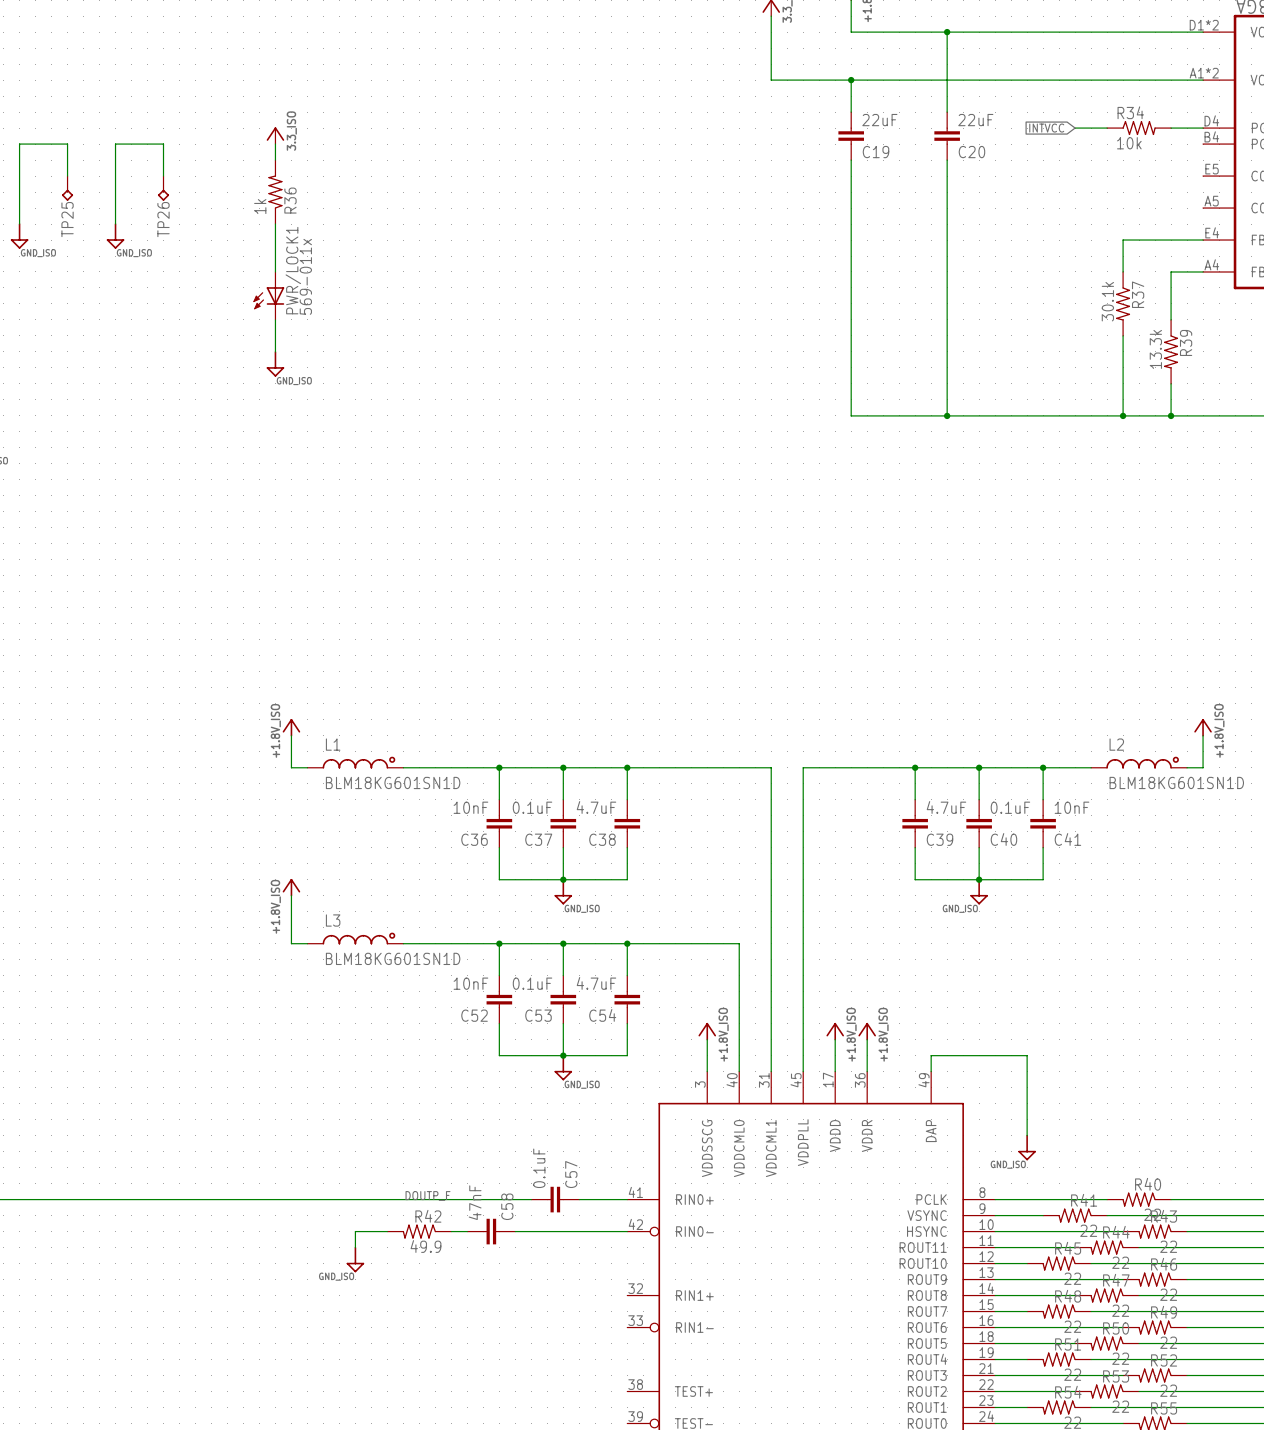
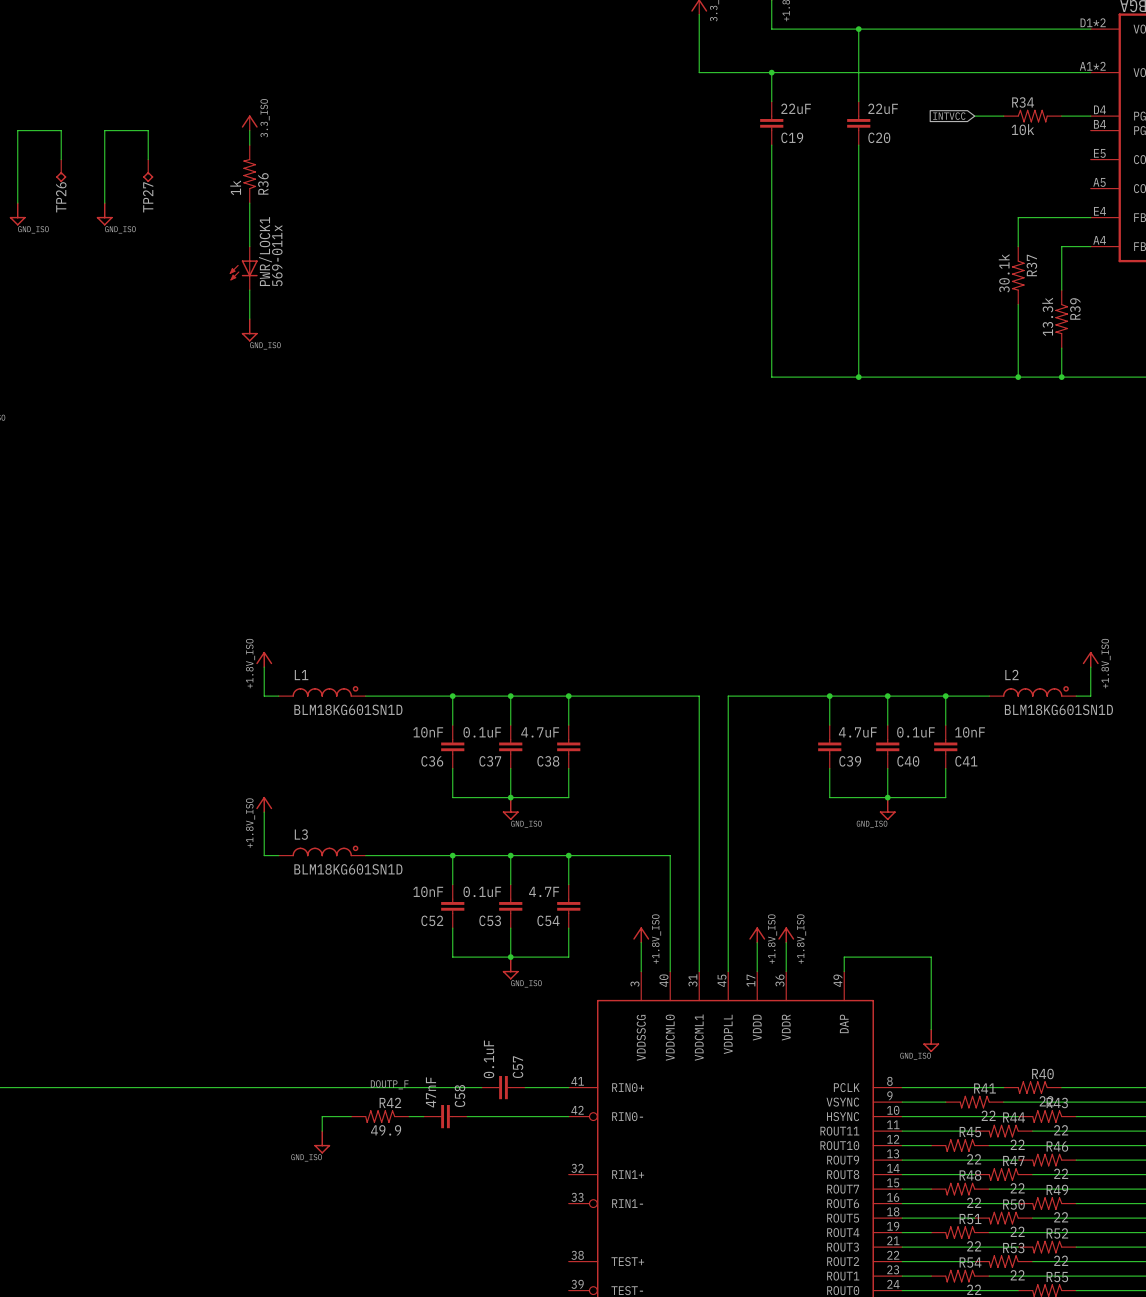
TP25 name: TP25 (67, 219) -> TP26 (61, 197)
TP26 name: TP26 (163, 219) -> TP27 (148, 197)
C54 value: 4.7uF (596, 983) -> 4.7F (544, 891)

